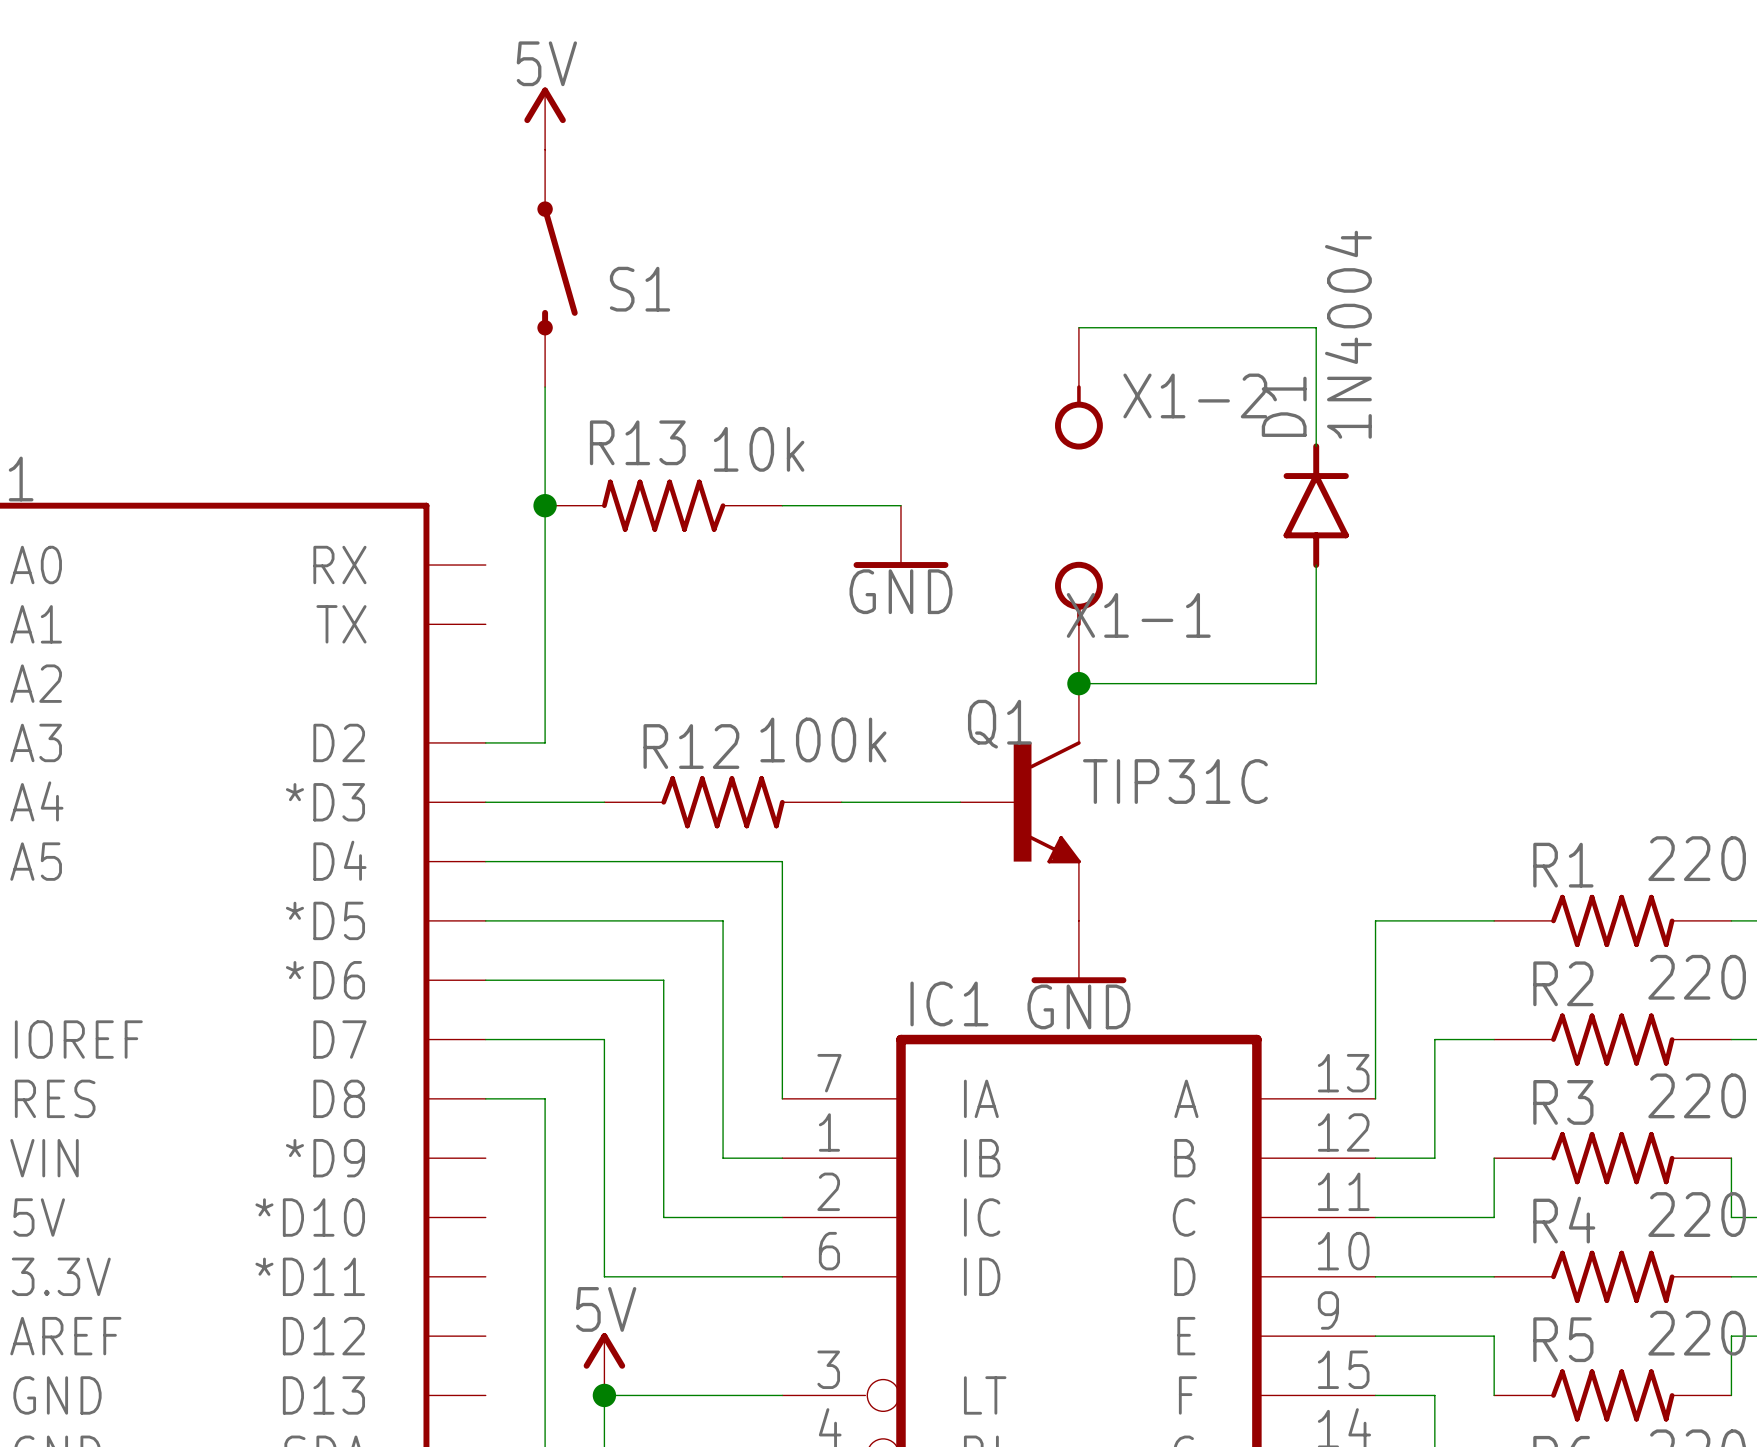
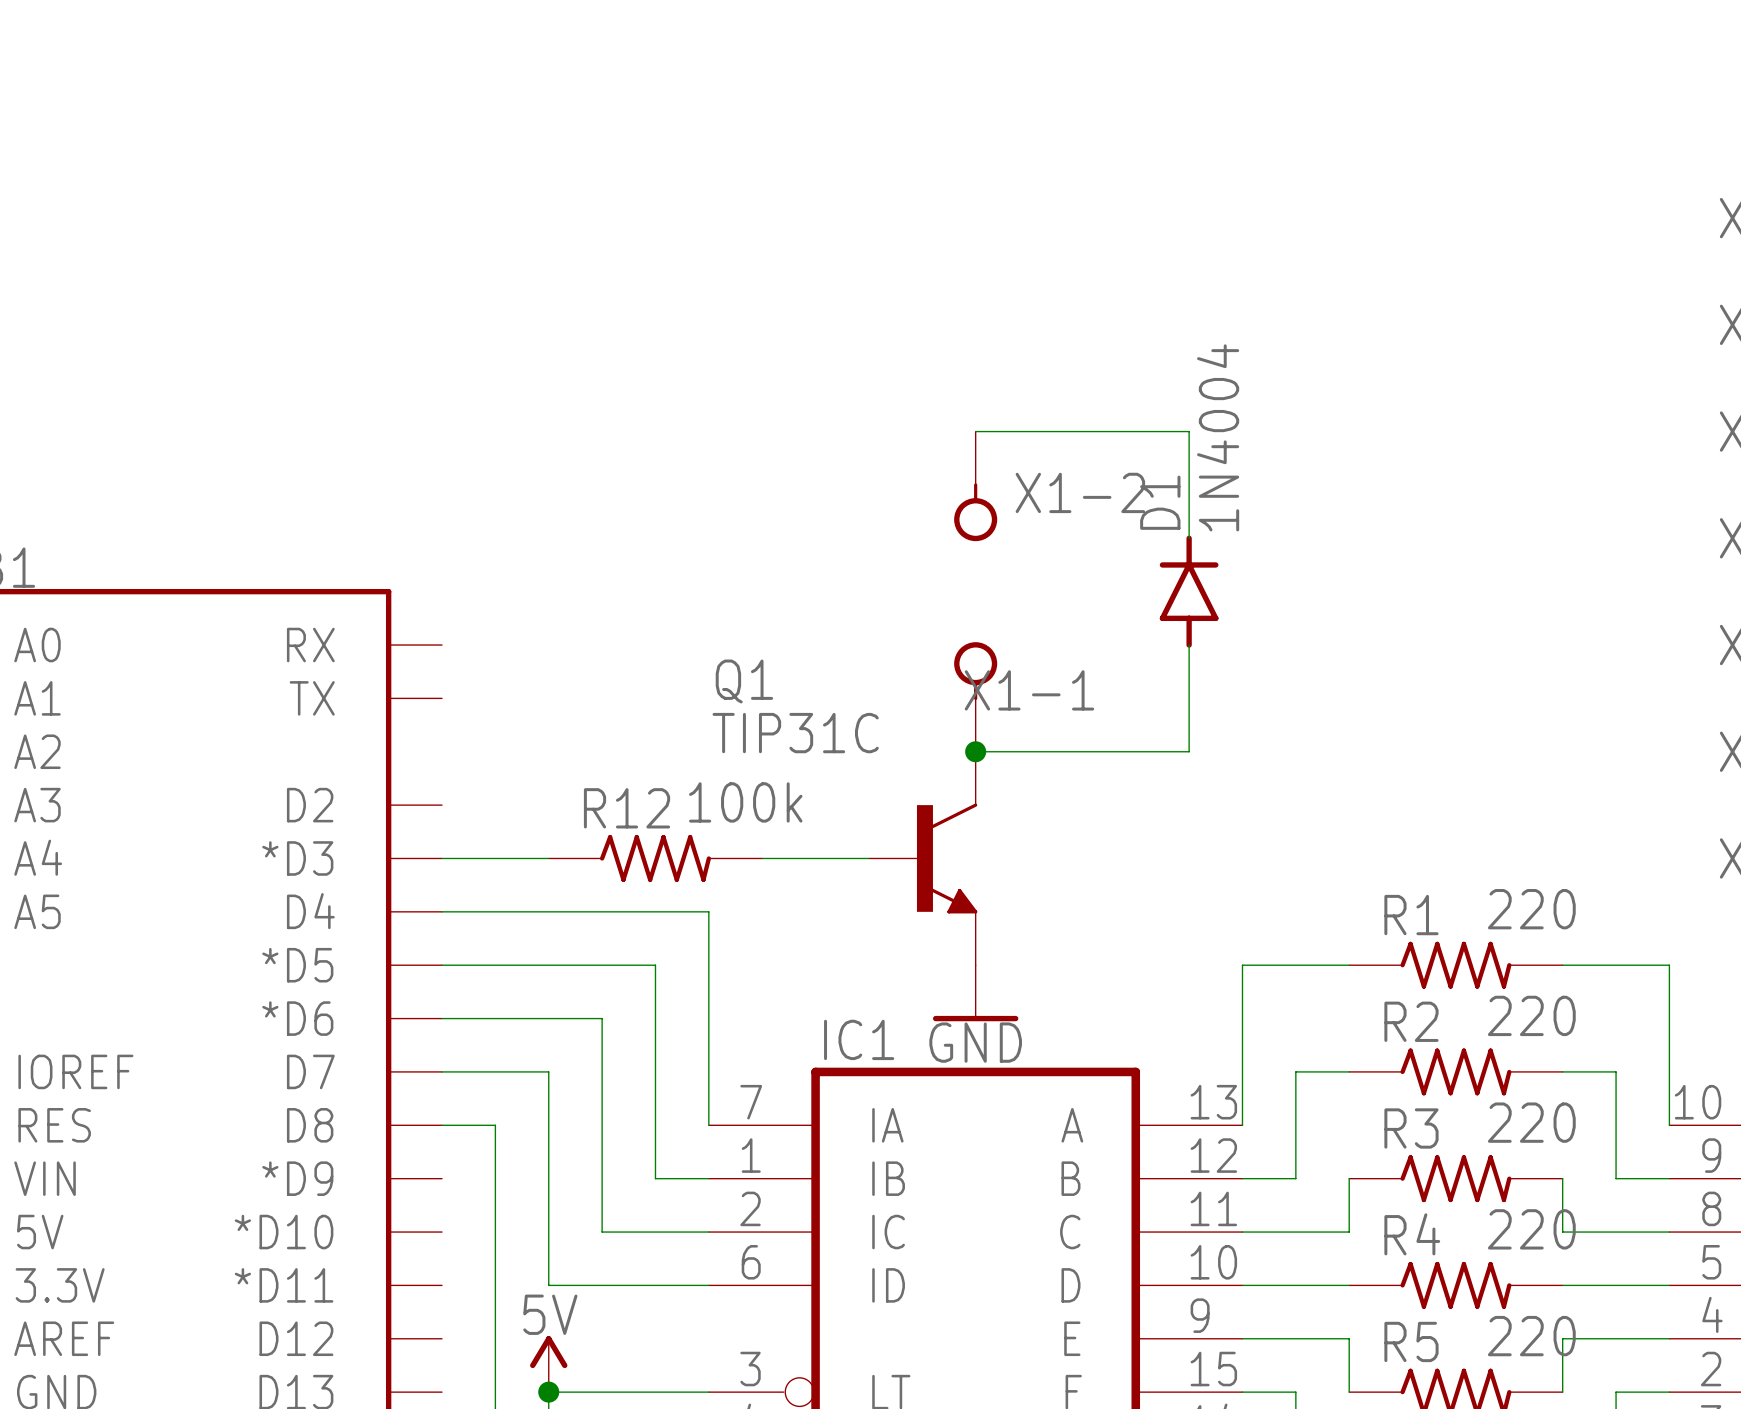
power symbol: 5V (545, 118) -> none
S1: (557, 268) -> none
wire: (545, 387) (545, 742) (485, 742) -> none
junction: (545, 505) -> none
R13: 10k (663, 505) -> none
wire: (782, 505) (900, 505) -> none
power symbol: GND (900, 536) -> none
Q1 name position: Q1 (999, 724) -> Q1 (744, 681)
Q1 value position: TIP31C (1175, 781) -> TIP31C (795, 733)

